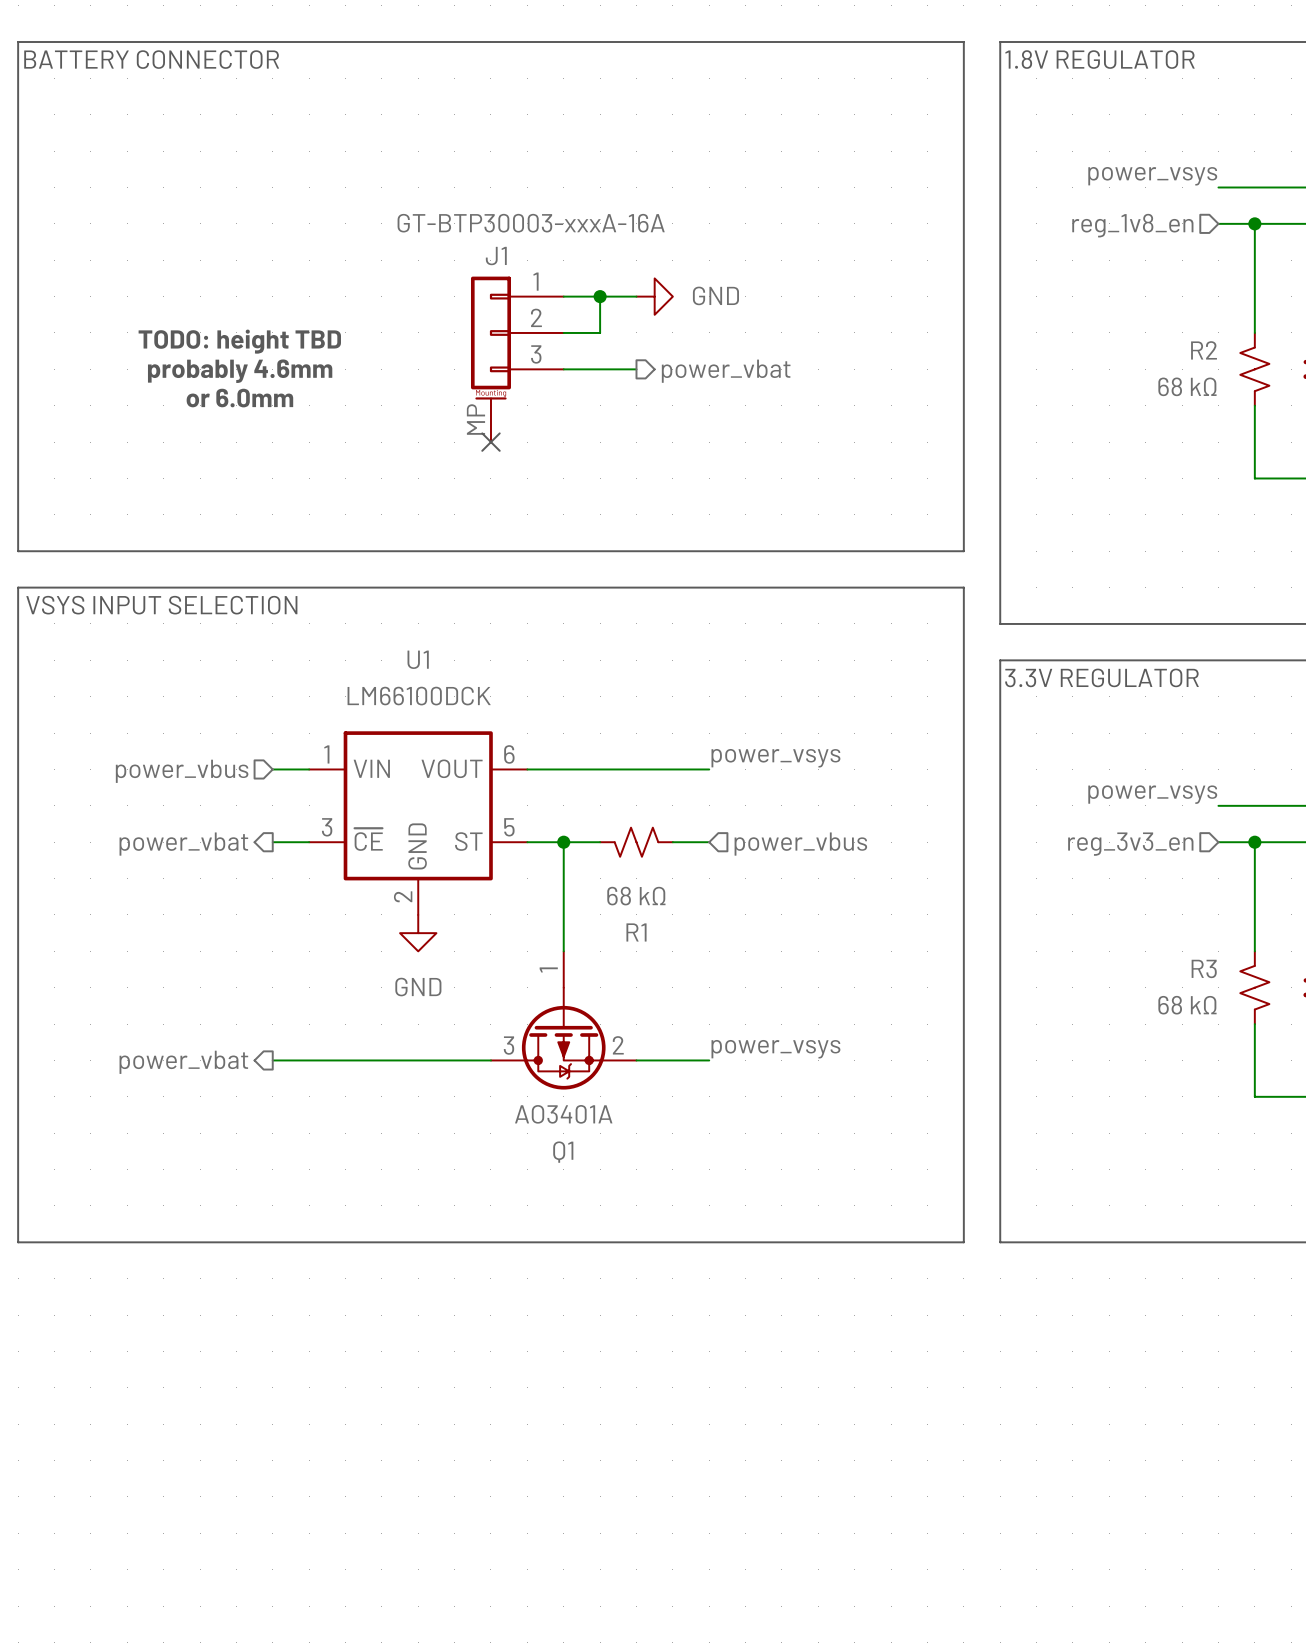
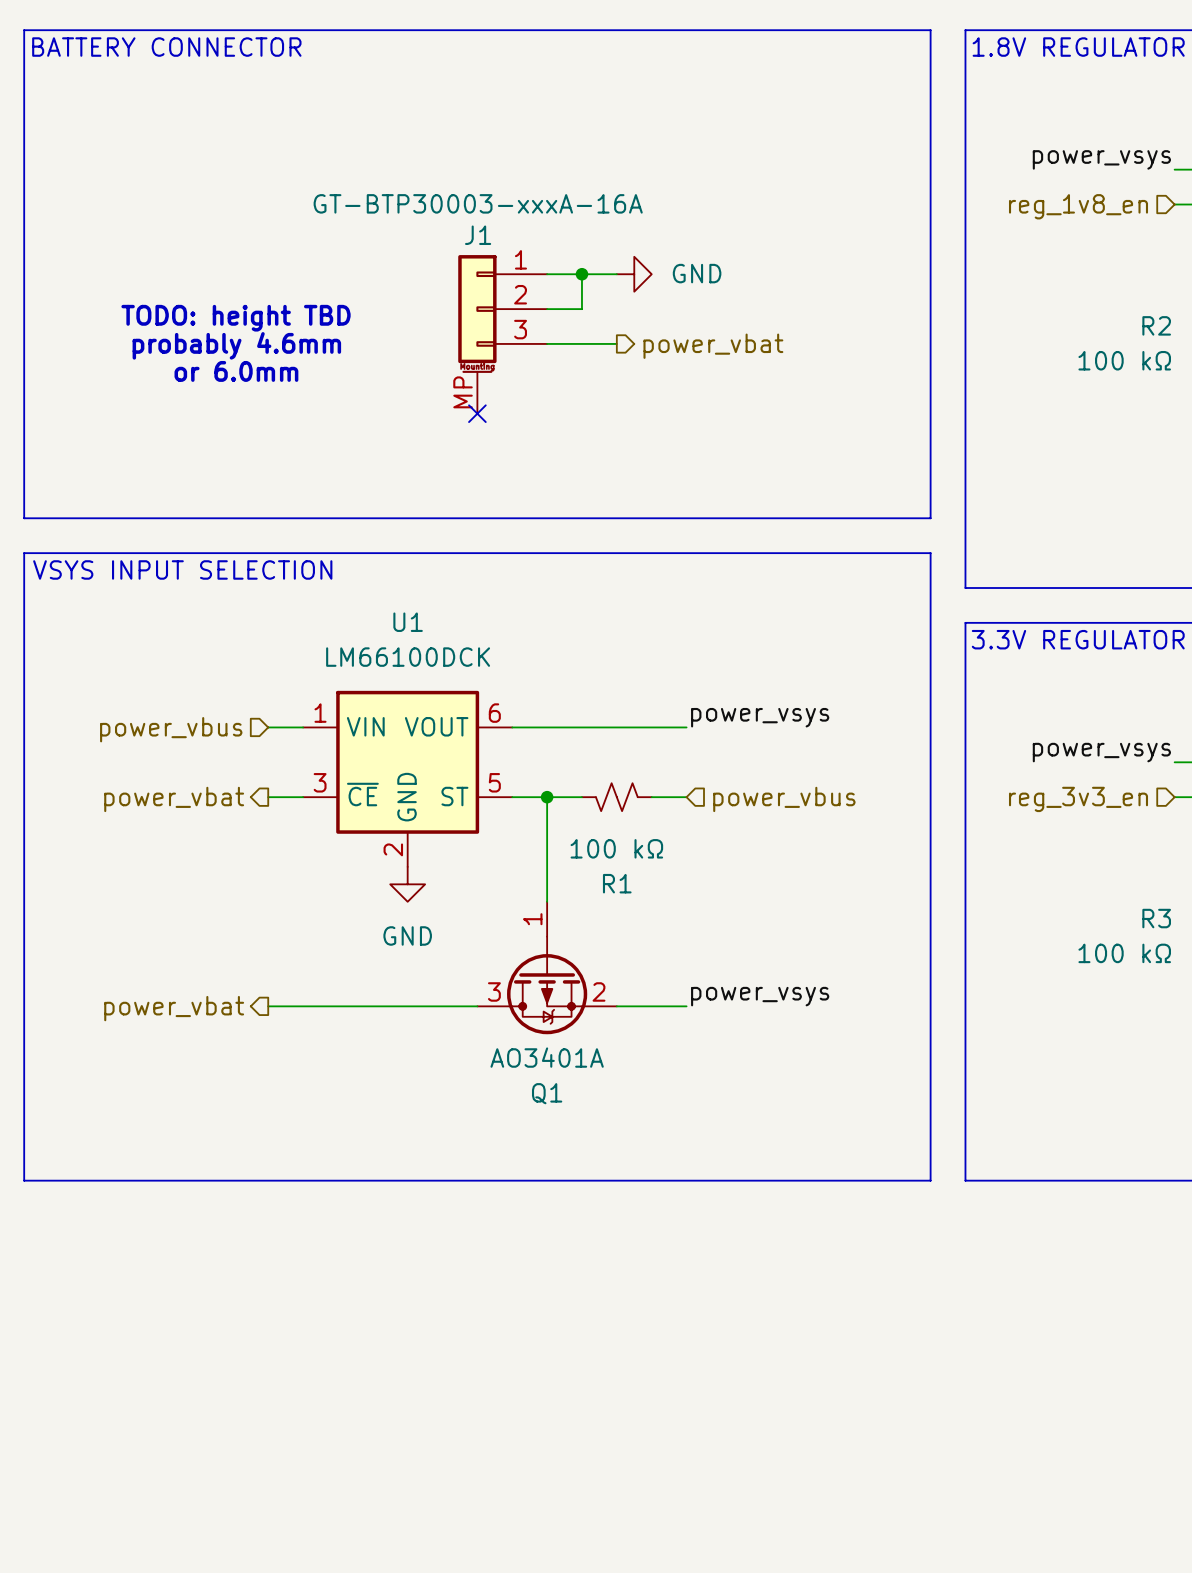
R2 value: 68 kΩ (1187, 386) -> 100 kΩ (1124, 360)
R1 value: 68 kΩ (636, 896) -> 100 kΩ (616, 848)
R3 value: 68 kΩ (1187, 1005) -> 100 kΩ (1124, 953)

